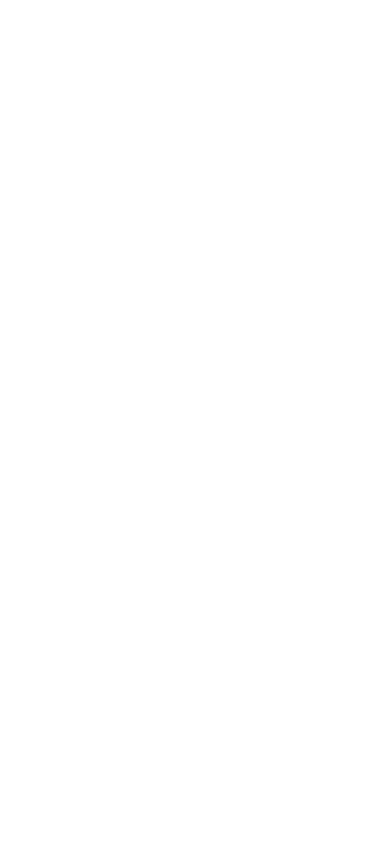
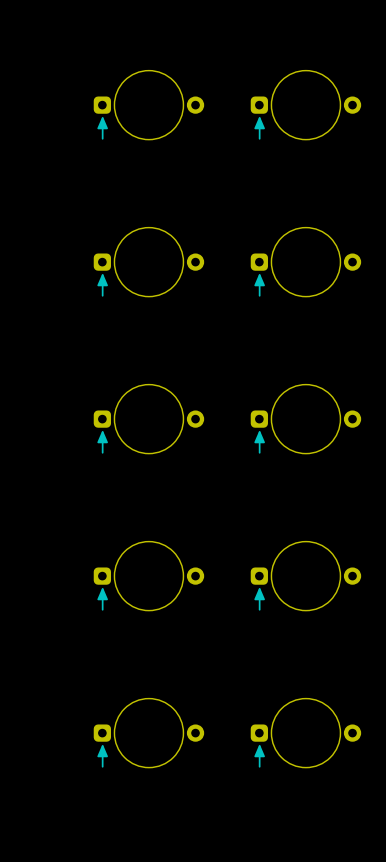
part: none -> (148, 105)
part: none -> (305, 105)
part: none -> (148, 262)
part: none -> (305, 262)
part: none -> (148, 419)
part: none -> (305, 419)
part: none -> (148, 576)
part: none -> (305, 576)
part: none -> (148, 733)
part: none -> (305, 733)

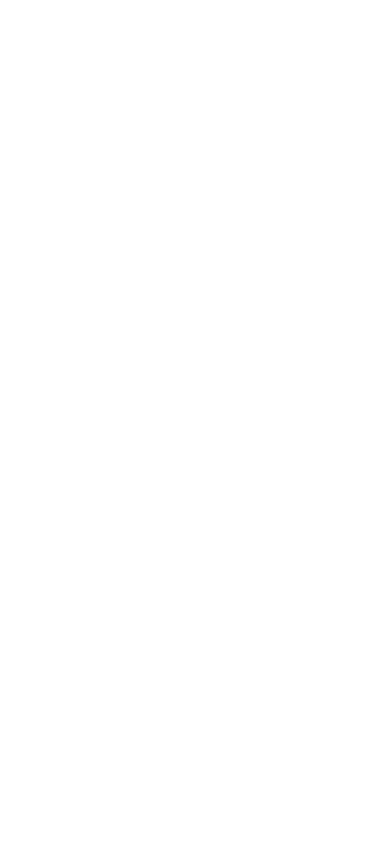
part: (148, 105) -> none
part: (305, 105) -> none
part: (148, 262) -> none
part: (305, 262) -> none
part: (148, 419) -> none
part: (305, 419) -> none
part: (148, 576) -> none
part: (305, 576) -> none
part: (148, 733) -> none
part: (305, 733) -> none

